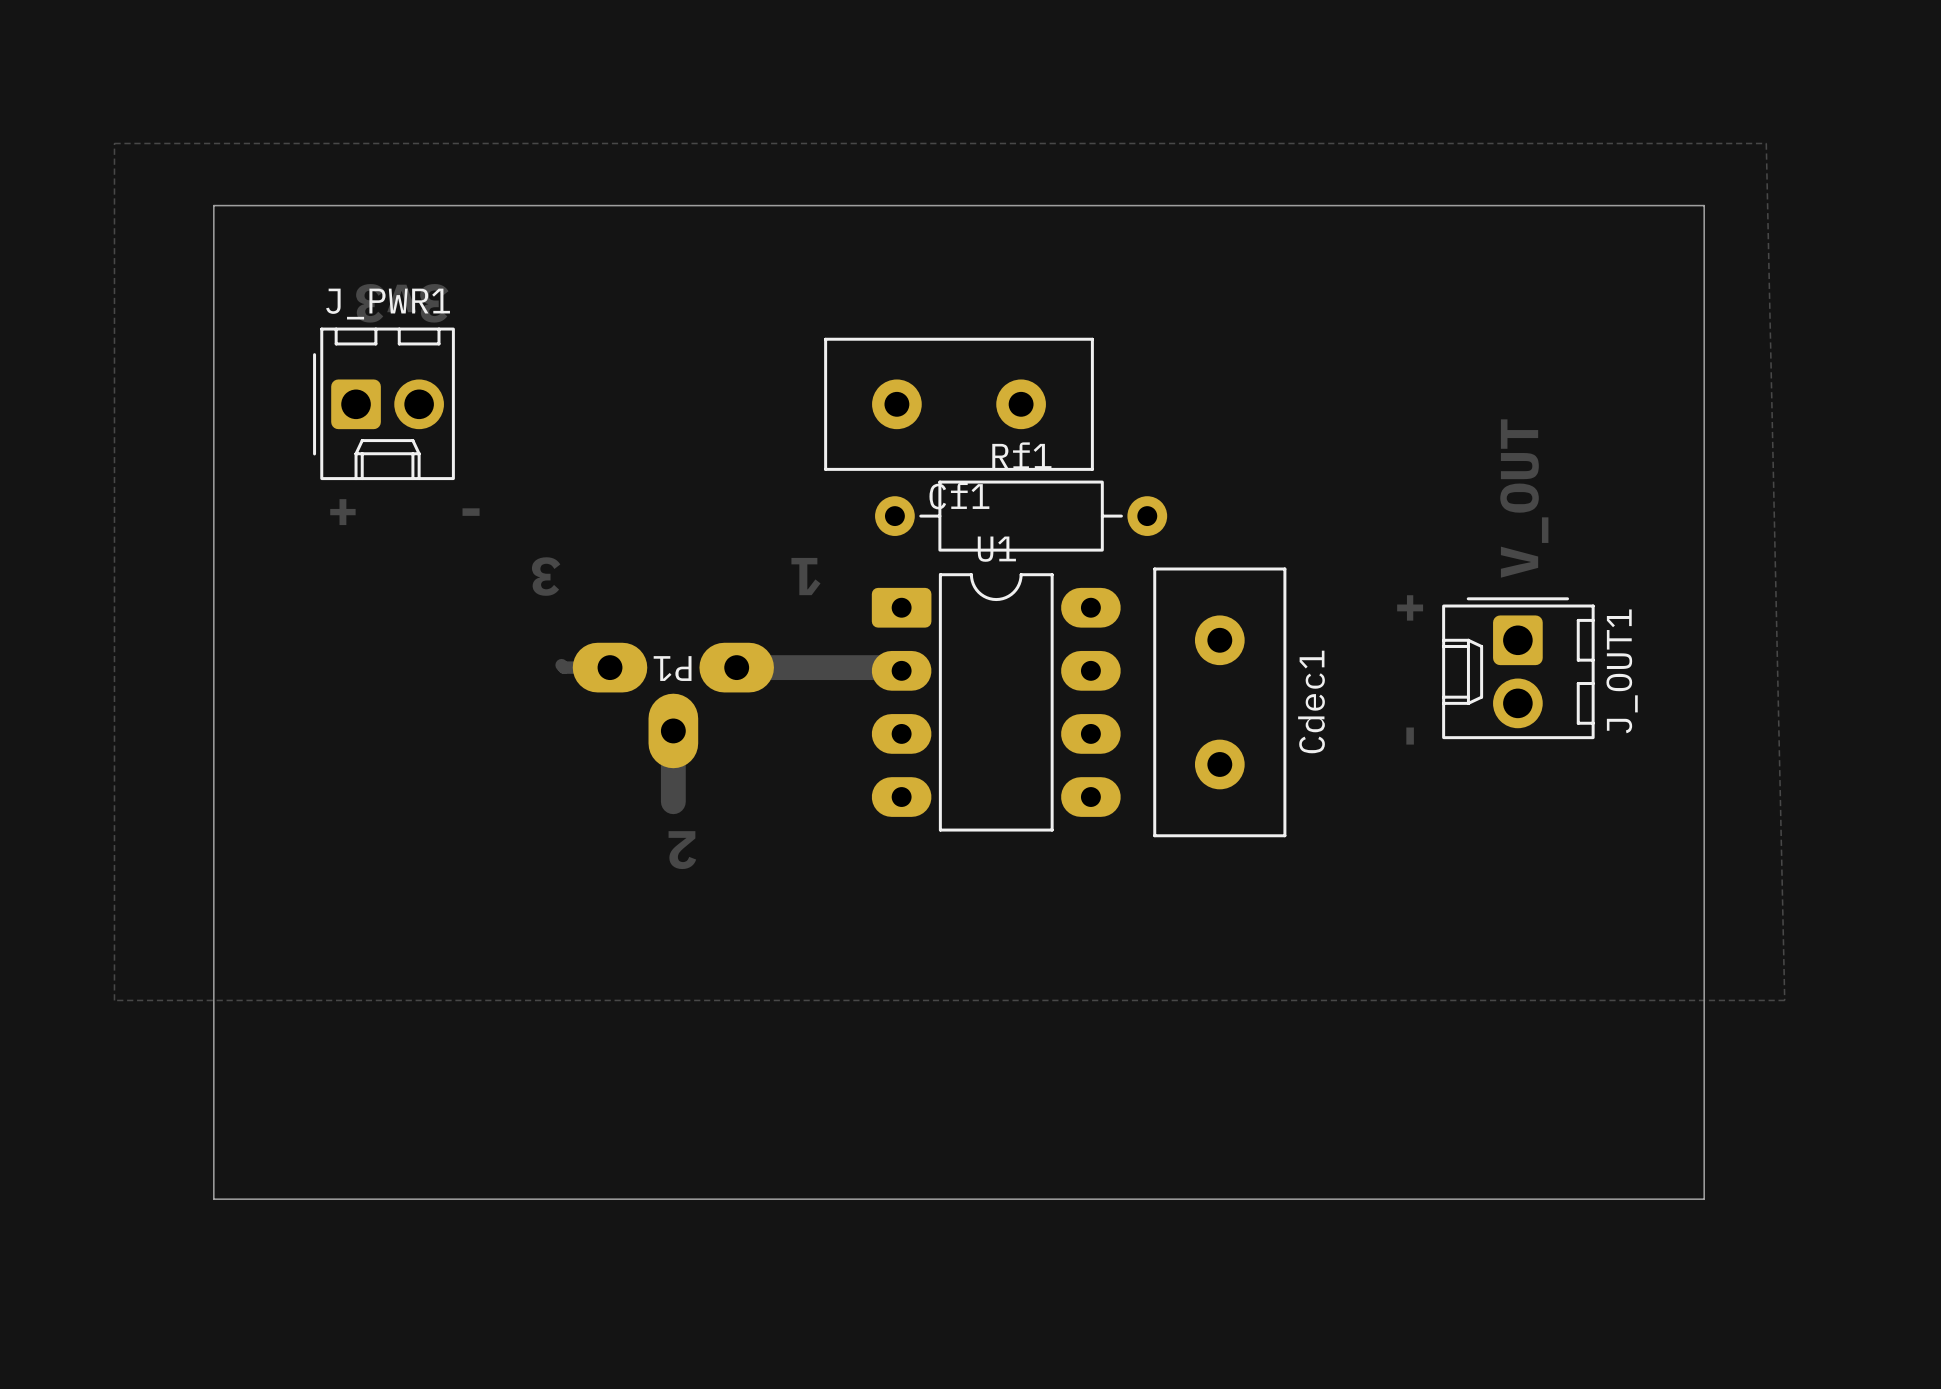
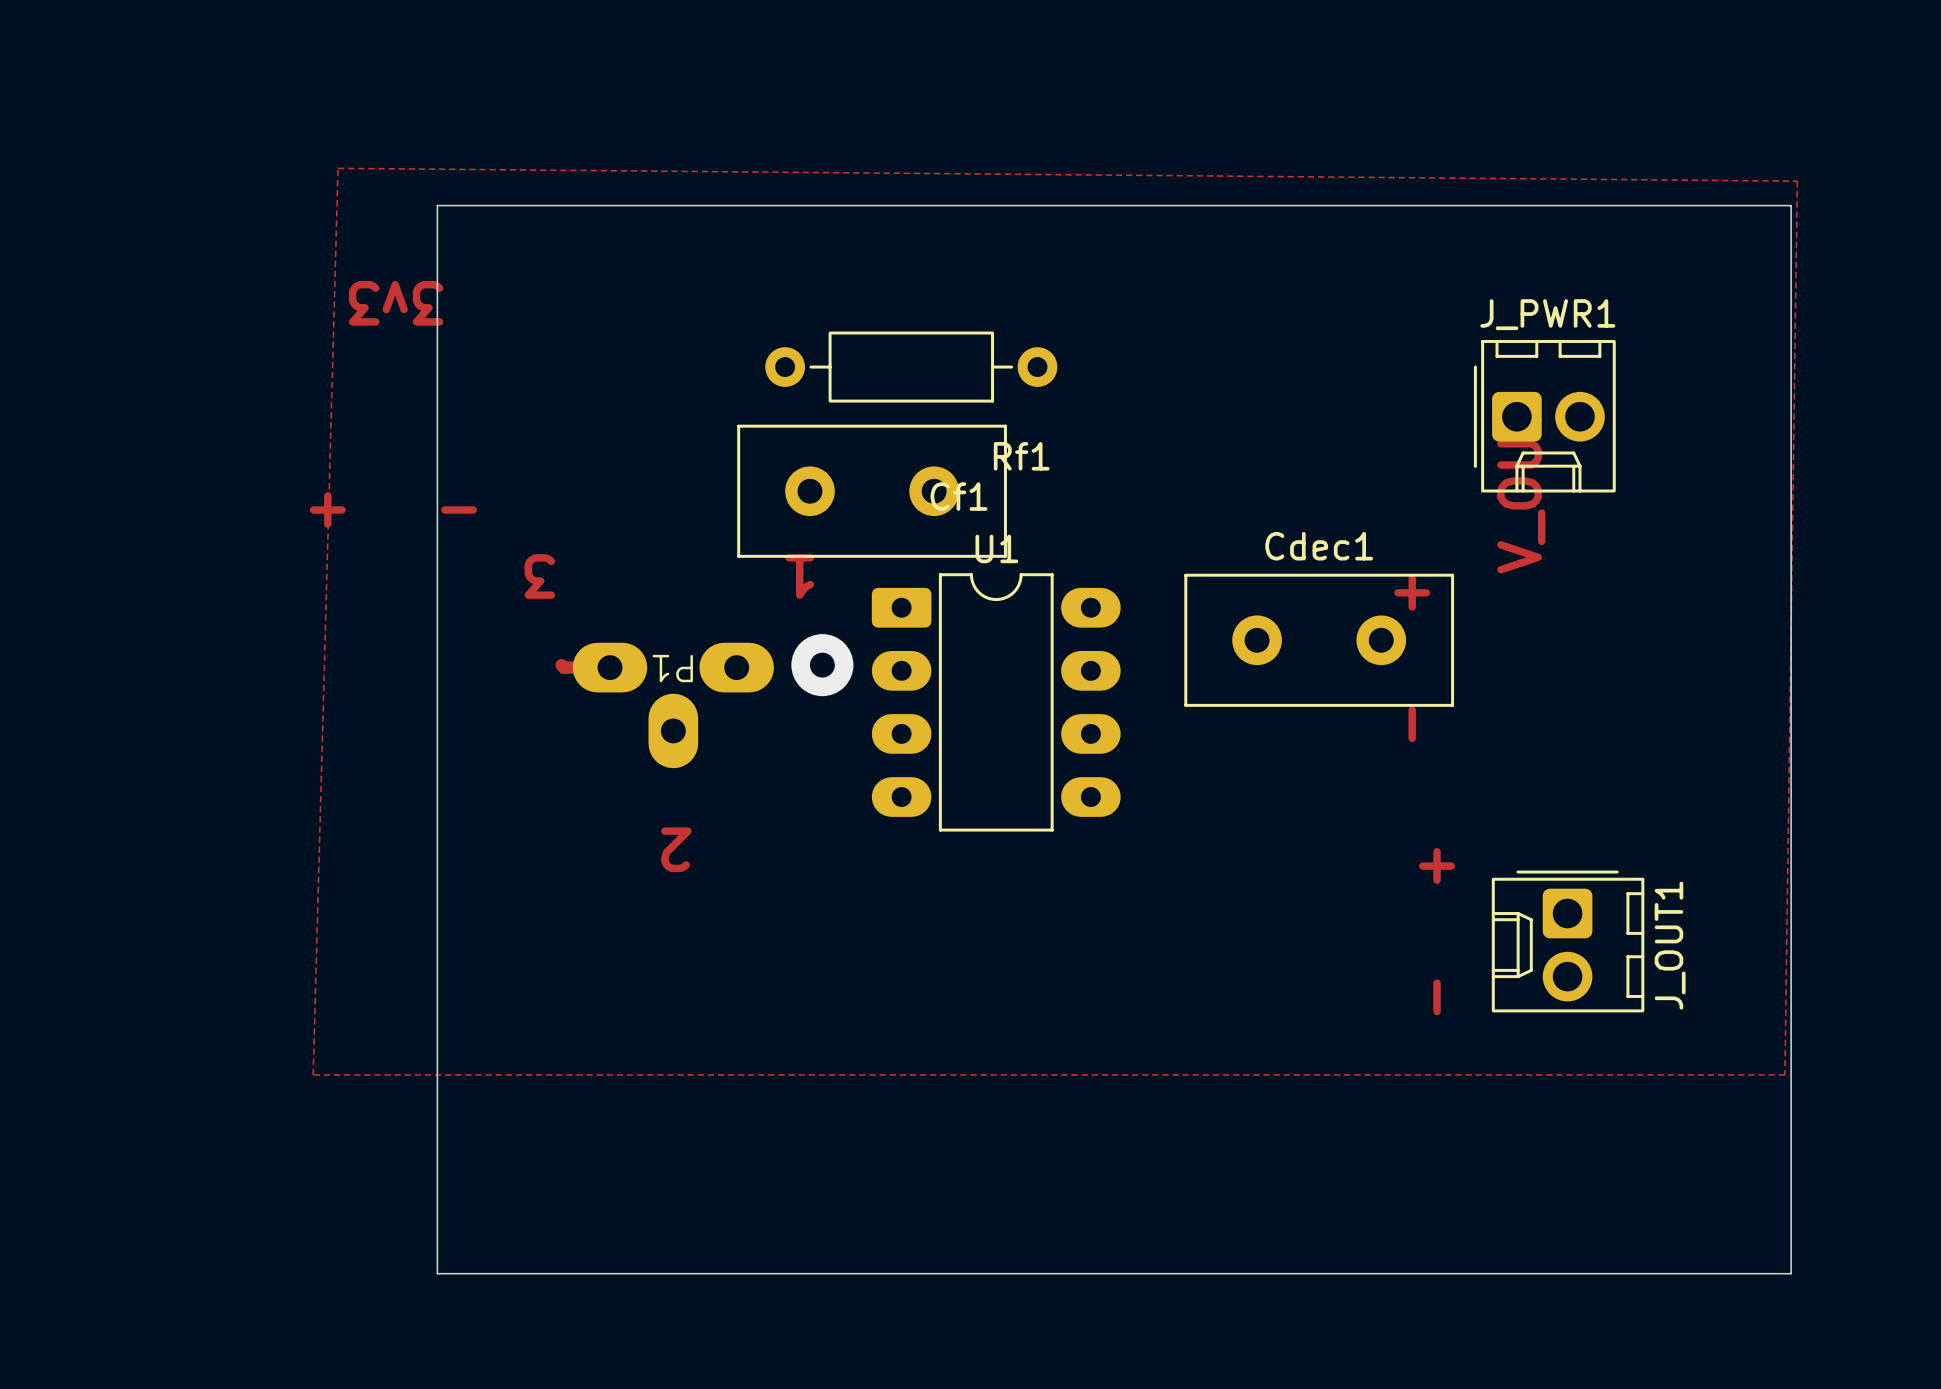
zone outline: (114, 143) (1766, 143) (1784, 1000) (114, 1000) (114, 143) -> (338, 168) (313, 1074) (1784, 1074) (1797, 181) (338, 168)
board edge: (437, 205) (213, 205) (213, 1199) (1704, 1199) (1704, 205) -> (437, 205) (437, 1273) (1791, 1273) (1791, 205) (1704, 205)
J_PWR1 position: (383, 403) -> (1544, 416)
Cf1 position: (959, 404) -> (872, 491)
Rf1 position: (1021, 516) -> (911, 367)
via: none -> (822, 665)
track: (736, 667) (898, 667) (901, 670) -> none
J_OUT1 position: (1518, 668) -> (1568, 941)
Cdec1 name position: Cdec1 (1311, 701) -> Cdec1 (1319, 546)
Cdec1 rotation: 0° (1219, 702) -> 90° clockwise (1319, 640)
track: (673, 730) (673, 801) -> none
text: none -> - + (1437, 931)

